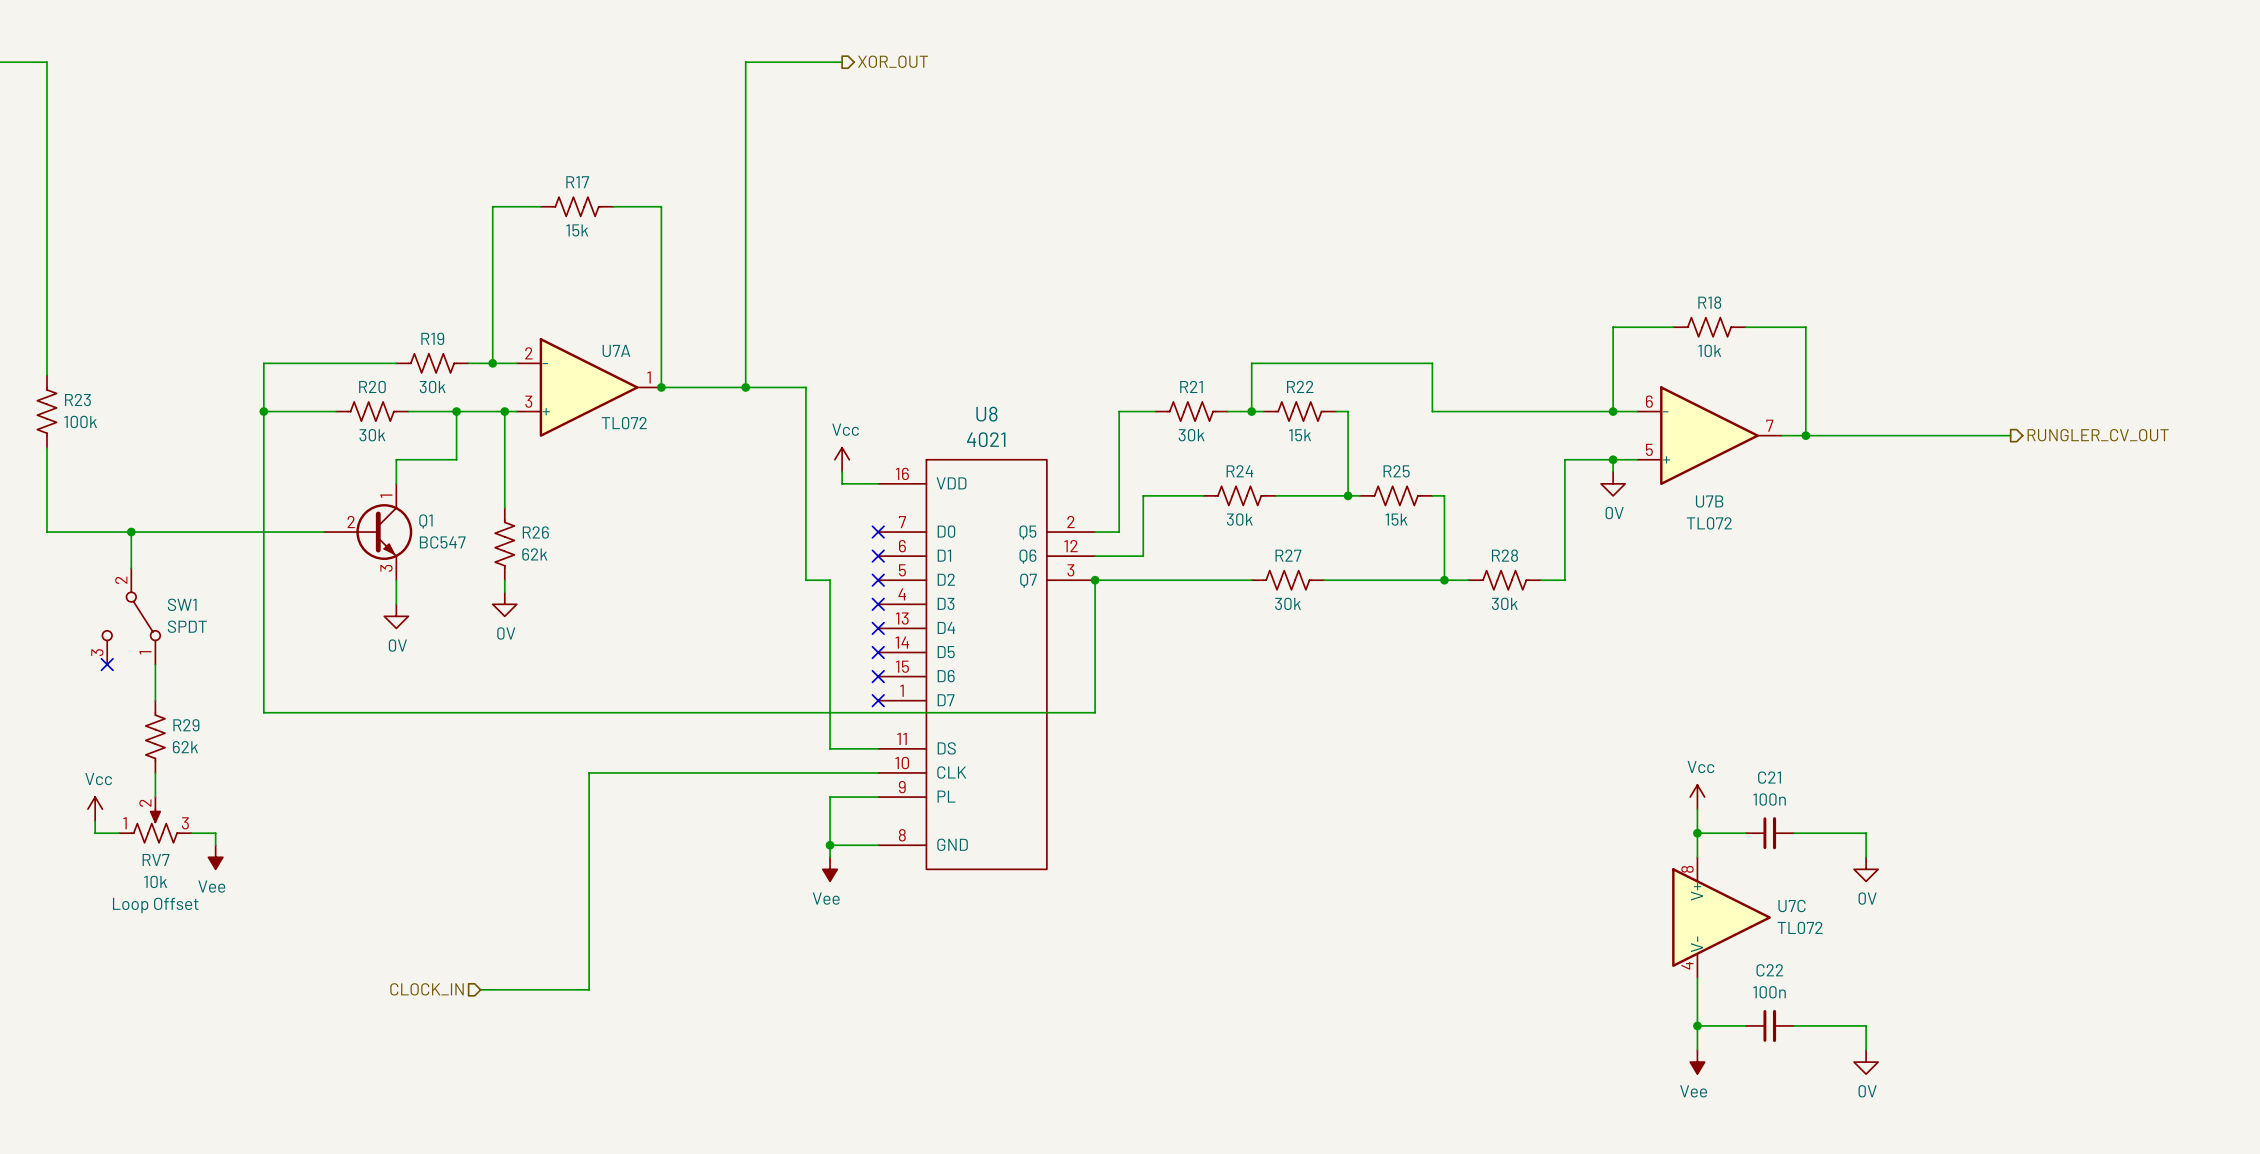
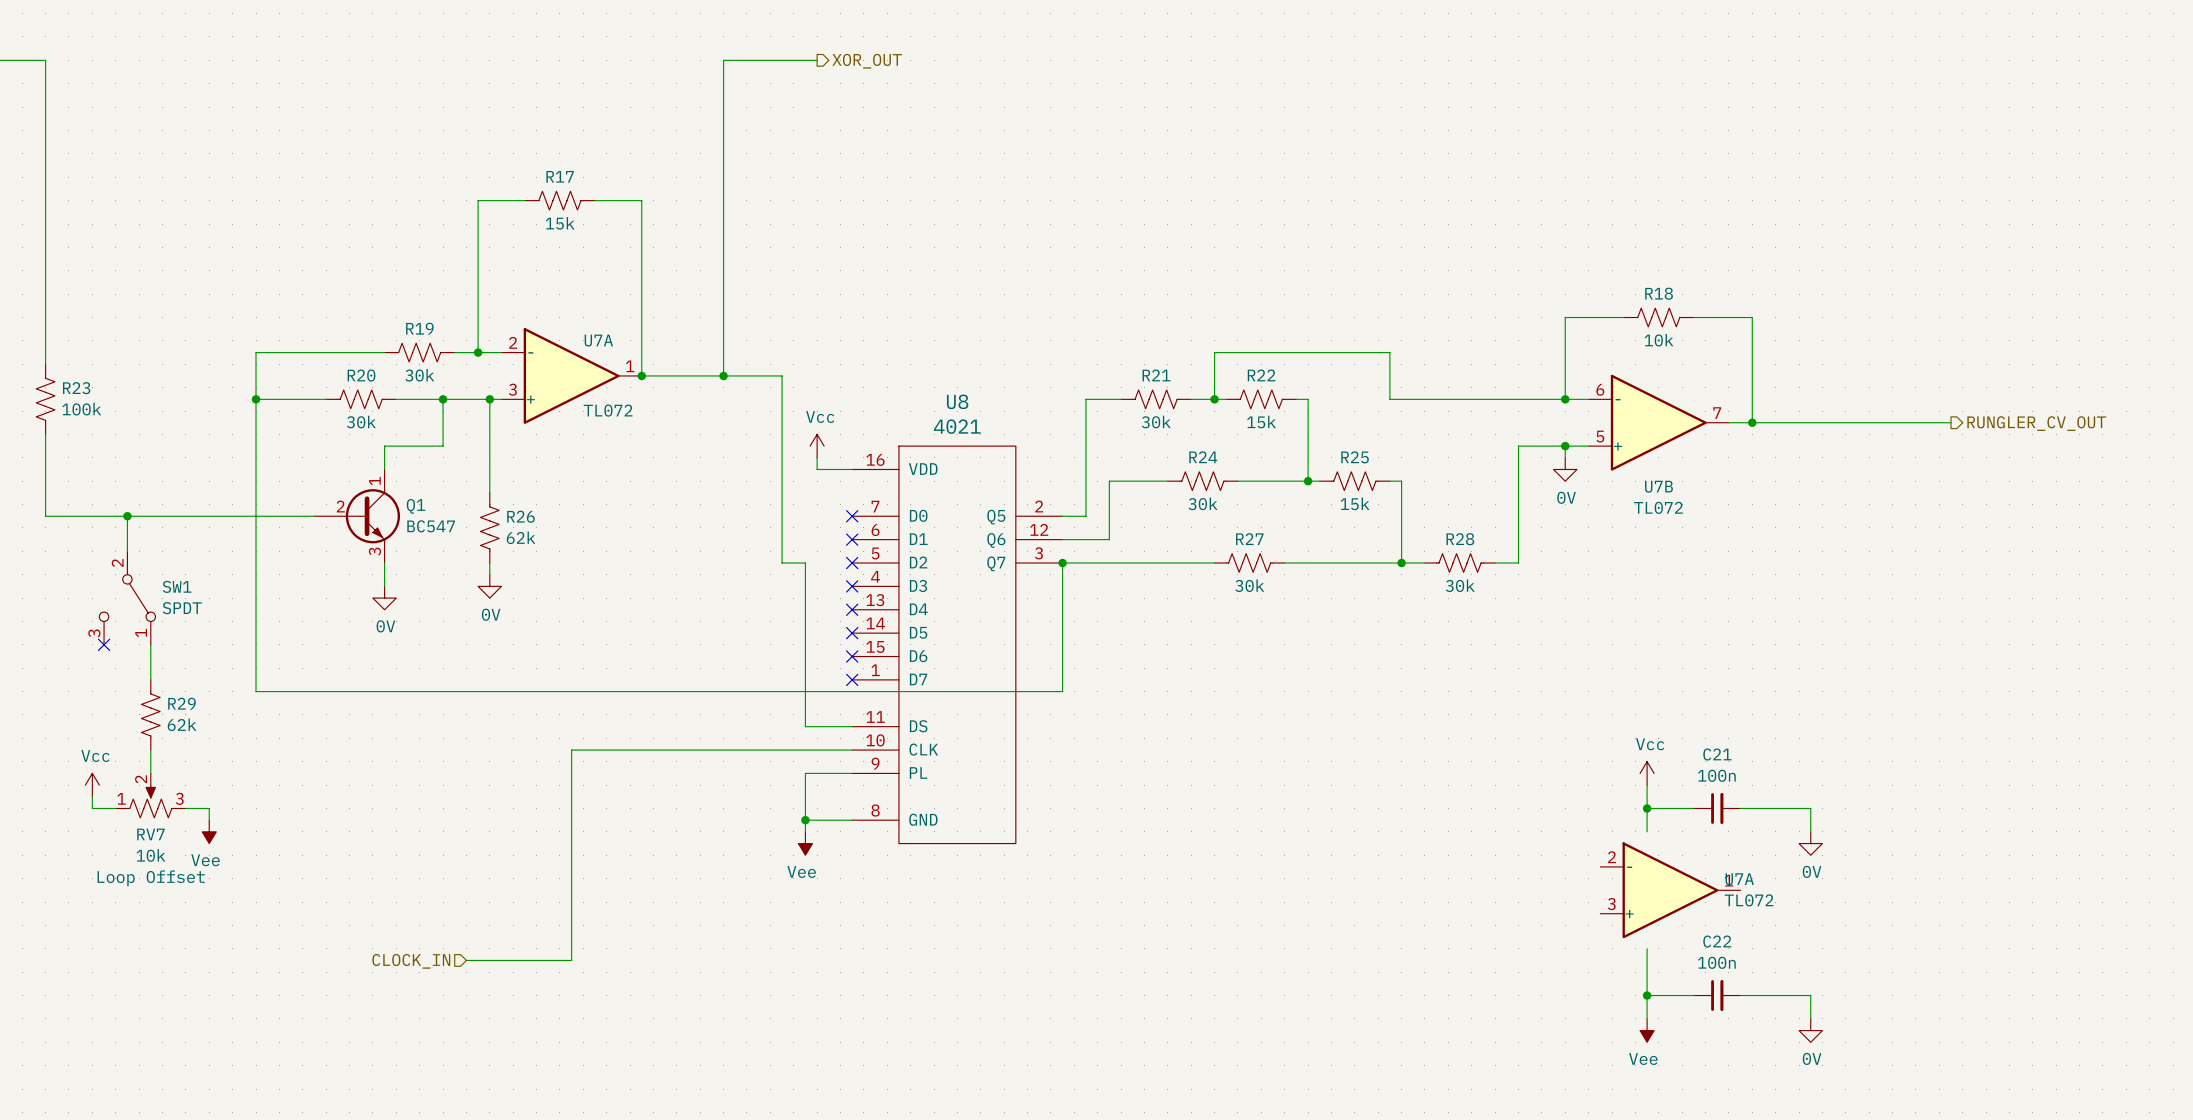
U7C: TL072 (1721, 917) -> none
U7A: none -> TL072 (1670, 890)

